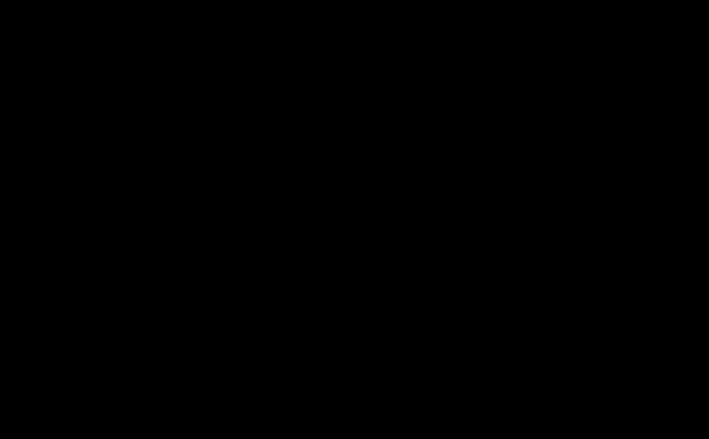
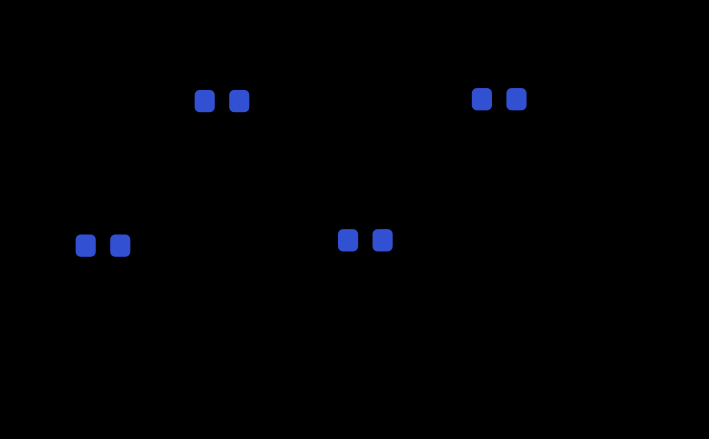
part: none -> (499, 99)
part: none -> (221, 101)
part: none -> (365, 240)
part: none -> (102, 245)

